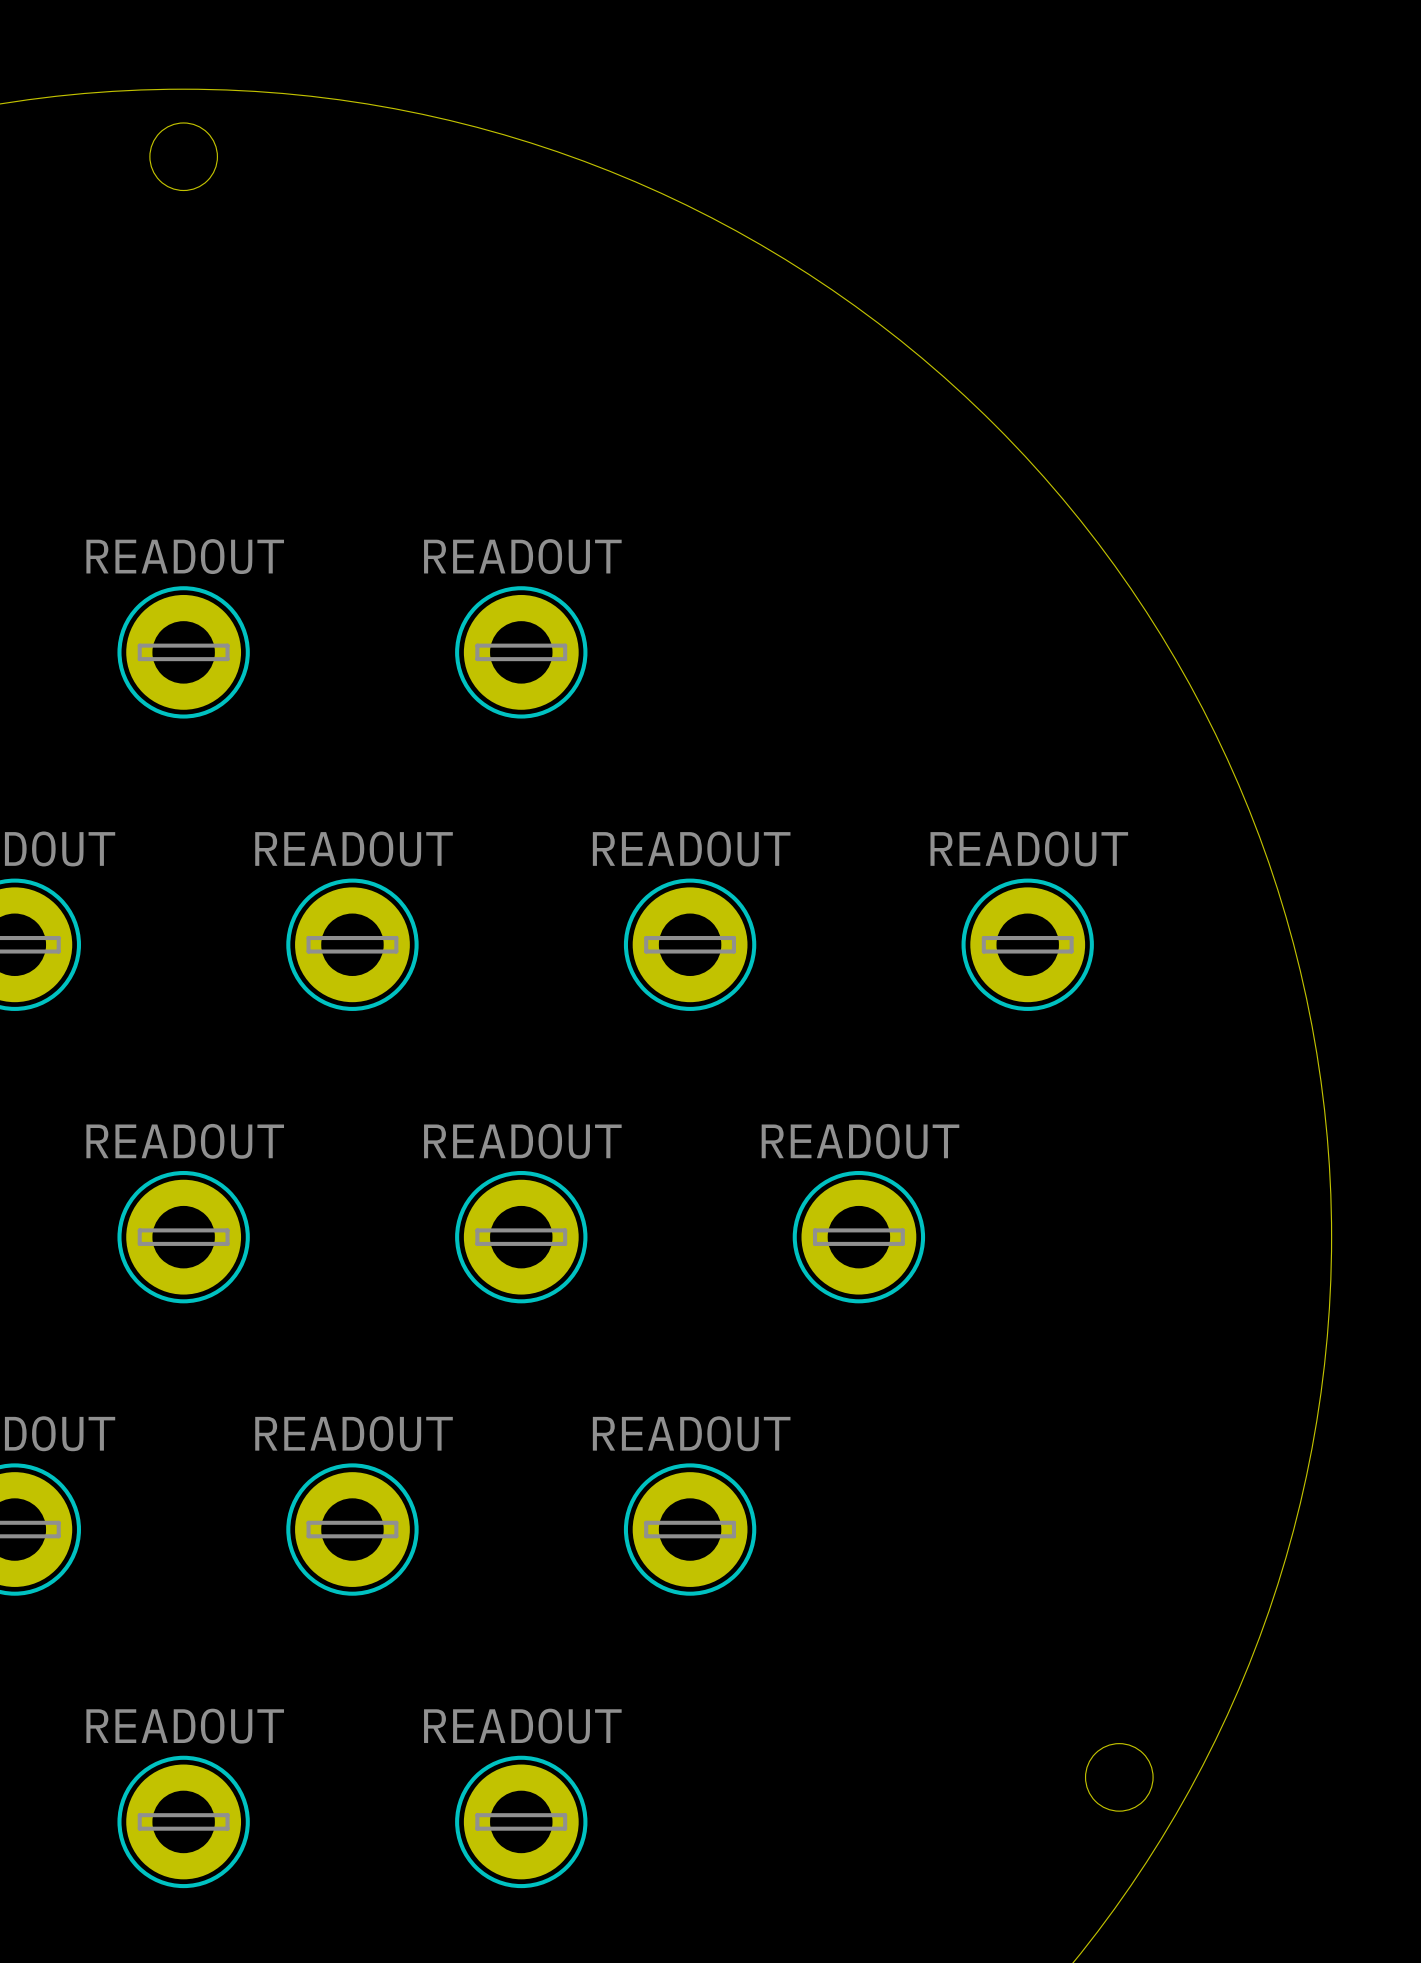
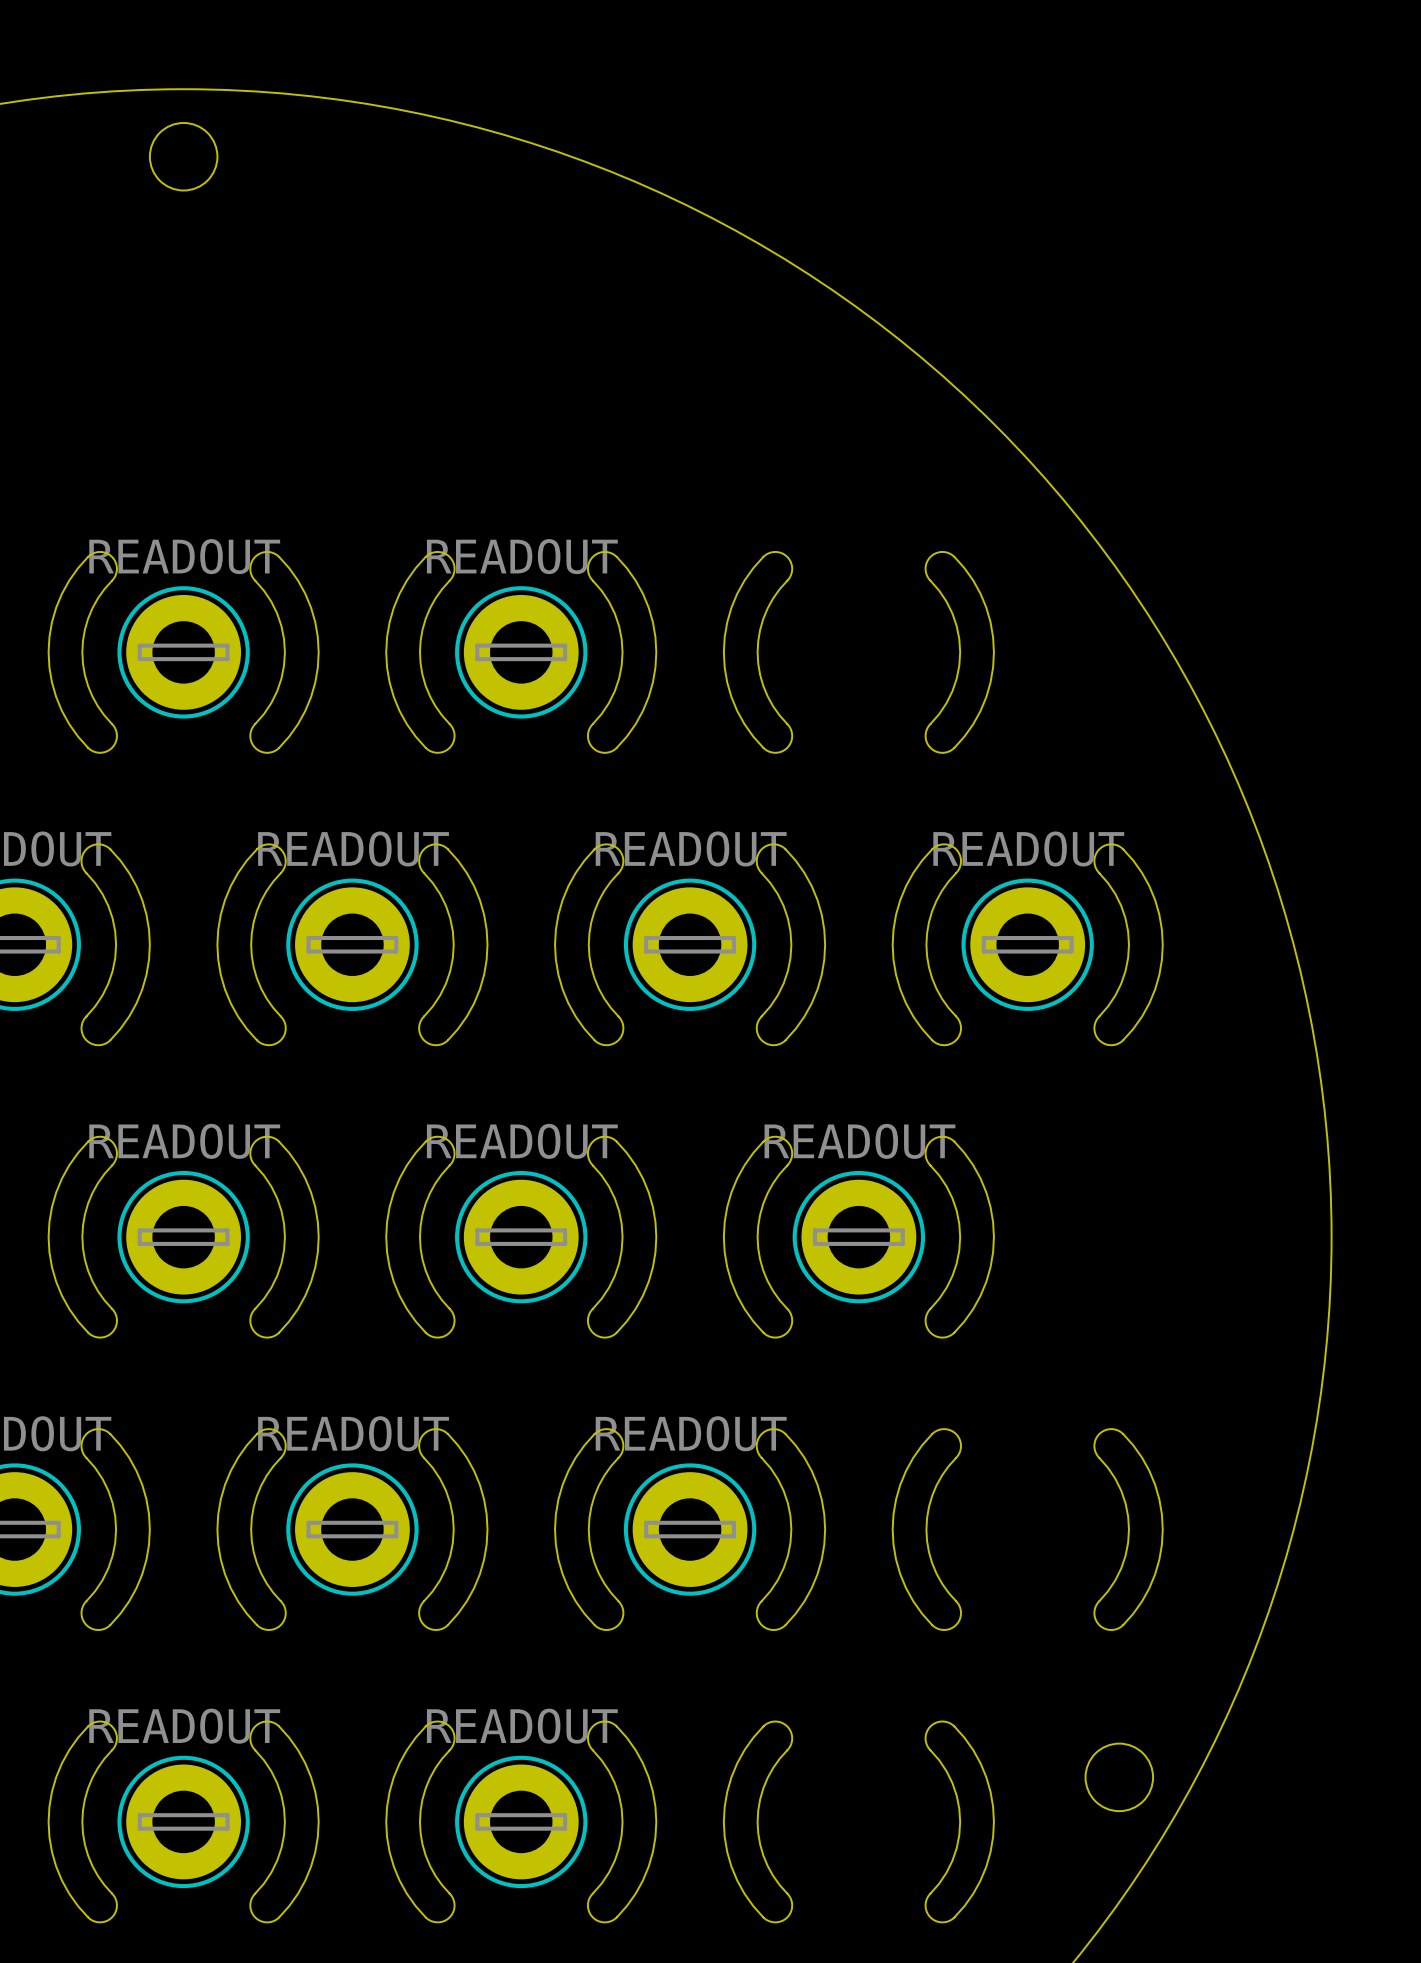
board edge: none -> (88, 556) (97, 552) (106, 553) (113, 558) (116, 566) (114, 577) (92, 608) (82, 641) (82, 663) (88, 685) (97, 706) (113, 725) (116, 733) (113, 746) (102, 752) (89, 749) (69, 724) (56, 696) (49, 667) (49, 637) (56, 607) (69, 580) (88, 556)
board edge: none -> (279, 556) (297, 580) (311, 607) (317, 637) (317, 667) (311, 696) (297, 724) (277, 749) (266, 752) (253, 746) (250, 732) (277, 691) (284, 665) (284, 639) (277, 613) (263, 590) (252, 577) (250, 567) (253, 558) (262, 552) (272, 552) (279, 556)
board edge: none -> (425, 556) (406, 580) (393, 607) (387, 637) (387, 667) (393, 696) (406, 724) (427, 749) (439, 752) (451, 746) (454, 733) (451, 725) (435, 706) (425, 685) (420, 663) (420, 641) (430, 608) (452, 577) (454, 566) (451, 558) (444, 553) (435, 552) (425, 556)
board edge: none -> (616, 556) (635, 580) (648, 607) (655, 637) (655, 667) (648, 696) (635, 724) (615, 749) (603, 752) (591, 746) (588, 732) (614, 691) (621, 665) (621, 639) (614, 613) (601, 590) (590, 577) (588, 566) (591, 558) (600, 552) (609, 552) (616, 556)
board edge: none -> (763, 556) (744, 580) (731, 607) (724, 637) (724, 667) (731, 696) (744, 724) (765, 749) (777, 752) (788, 746) (792, 733) (788, 725) (773, 706) (763, 685) (758, 663) (758, 641) (767, 608) (789, 577) (792, 566) (788, 558) (781, 553) (773, 552) (763, 556)
board edge: none -> (954, 556) (946, 552) (938, 552) (929, 558) (925, 566) (927, 577) (939, 590) (952, 613) (959, 639) (959, 665) (952, 691) (925, 732) (929, 746) (941, 752) (954, 747) (973, 724) (986, 696) (993, 667) (993, 637) (986, 607) (973, 580) (954, 556)
board edge: none -> (110, 849) (103, 845) (93, 845) (85, 850) (81, 860) (83, 869) (95, 883) (108, 906) (115, 931) (115, 957) (108, 983) (81, 1025) (85, 1038) (97, 1045) (110, 1040) (129, 1016) (142, 989) (149, 959) (149, 929) (142, 900) (129, 872) (110, 849)
board edge: none -> (256, 849) (265, 844) (273, 845) (282, 850) (285, 860) (283, 869) (261, 900) (251, 933) (251, 956) (256, 978) (266, 998) (282, 1018) (285, 1026) (282, 1038) (271, 1045) (258, 1041) (238, 1016) (224, 989) (218, 959) (218, 929) (224, 900) (238, 872) (256, 849)
board edge: none -> (447, 849) (466, 872) (479, 900) (486, 929) (486, 959) (479, 989) (466, 1016) (446, 1041) (433, 1045) (422, 1038) (419, 1026) (421, 1019) (432, 1006) (446, 983) (452, 957) (452, 931) (446, 906) (432, 883) (421, 869) (419, 859) (422, 850) (431, 844) (440, 844) (447, 849)
board edge: none -> (594, 849) (603, 844) (611, 845) (619, 850) (623, 860) (620, 869) (598, 900) (589, 933) (589, 956) (594, 978) (604, 998) (619, 1018) (623, 1026) (619, 1038) (608, 1045) (596, 1041) (575, 1016) (562, 989) (555, 959) (555, 929) (562, 900) (575, 872) (594, 849)
board edge: none -> (785, 849) (804, 872) (817, 900) (824, 929) (824, 959) (817, 989) (804, 1016) (783, 1041) (771, 1045) (760, 1038) (756, 1026) (759, 1019) (770, 1006) (783, 983) (790, 957) (790, 931) (783, 906) (770, 883) (759, 869) (756, 860) (760, 850) (768, 845) (778, 845) (785, 849)
board edge: none -> (932, 849) (913, 872) (900, 900) (893, 929) (893, 959) (900, 989) (913, 1016) (933, 1041) (946, 1045) (957, 1038) (960, 1026) (957, 1018) (941, 998) (932, 978) (927, 956) (927, 933) (936, 900) (958, 869) (961, 860) (957, 850) (949, 845) (941, 844) (932, 849)
board edge: none -> (1123, 849) (1116, 845) (1106, 845) (1097, 850) (1094, 860) (1096, 869) (1108, 883) (1121, 906) (1128, 931) (1128, 957) (1121, 983) (1108, 1006) (1096, 1019) (1094, 1026) (1097, 1038) (1109, 1045) (1121, 1041) (1142, 1016) (1155, 989) (1161, 959) (1161, 929) (1155, 900) (1142, 872) (1123, 849)
board edge: none -> (88, 1141) (69, 1165) (56, 1192) (49, 1222) (49, 1252) (56, 1281) (69, 1309) (88, 1332) (101, 1337) (113, 1331) (116, 1317) (113, 1310) (97, 1291) (88, 1270) (82, 1248) (82, 1225) (92, 1193) (114, 1162) (116, 1152) (113, 1143) (105, 1137) (95, 1137) (88, 1141)
board edge: none -> (279, 1141) (298, 1165) (311, 1192) (317, 1222) (317, 1252) (311, 1281) (298, 1309) (279, 1332) (266, 1337) (253, 1331) (250, 1317) (277, 1275) (284, 1250) (284, 1223) (277, 1198) (264, 1175) (252, 1162) (250, 1151) (253, 1143) (260, 1137) (269, 1136) (279, 1141)
board edge: none -> (425, 1141) (435, 1136) (444, 1138) (451, 1143) (454, 1151) (452, 1162) (430, 1193) (420, 1225) (420, 1248) (425, 1270) (435, 1291) (451, 1310) (454, 1318) (451, 1330) (439, 1337) (427, 1334) (406, 1309) (393, 1281) (387, 1252) (387, 1222) (393, 1192) (406, 1165) (425, 1141)
board edge: none -> (616, 1141) (635, 1165) (648, 1192) (655, 1222) (655, 1252) (648, 1281) (635, 1309) (615, 1334) (602, 1337) (591, 1331) (588, 1318) (590, 1312) (601, 1298) (614, 1275) (621, 1250) (621, 1223) (614, 1198) (601, 1175) (590, 1162) (588, 1151) (591, 1143) (600, 1137) (609, 1137) (616, 1141)
board edge: none -> (763, 1141) (773, 1136) (781, 1138) (788, 1143) (792, 1151) (789, 1162) (767, 1193) (758, 1225) (758, 1248) (763, 1270) (773, 1291) (788, 1310) (792, 1318) (788, 1330) (777, 1337) (765, 1334) (744, 1309) (731, 1281) (724, 1252) (724, 1222) (731, 1192) (744, 1165) (763, 1141)
board edge: none -> (954, 1141) (973, 1165) (986, 1192) (993, 1222) (993, 1252) (986, 1281) (973, 1309) (952, 1334) (940, 1337) (929, 1331) (925, 1318) (927, 1312) (939, 1298) (952, 1275) (959, 1250) (959, 1223) (952, 1198) (939, 1175) (928, 1162) (925, 1152) (929, 1143) (937, 1137) (947, 1137) (954, 1141)
board edge: none -> (110, 1434) (129, 1457) (142, 1484) (149, 1514) (149, 1544) (142, 1574) (129, 1601) (108, 1626) (96, 1629) (84, 1623) (81, 1610) (83, 1604) (95, 1591) (108, 1568) (115, 1542) (115, 1516) (108, 1490) (95, 1467) (83, 1454) (81, 1444) (85, 1435) (93, 1429) (103, 1429) (110, 1434)
board edge: none -> (256, 1434) (266, 1429) (275, 1430) (282, 1435) (285, 1443) (283, 1454) (261, 1485) (251, 1518) (251, 1540) (256, 1562) (266, 1583) (282, 1602) (285, 1610) (282, 1623) (271, 1629) (258, 1626) (238, 1601) (224, 1574) (218, 1544) (218, 1514) (224, 1484) (238, 1457) (256, 1434)
board edge: none -> (447, 1434) (466, 1457) (479, 1484) (486, 1514) (486, 1544) (479, 1574) (466, 1601) (446, 1626) (434, 1629) (422, 1623) (419, 1610) (446, 1568) (452, 1542) (452, 1516) (446, 1490) (432, 1467) (421, 1454) (419, 1444) (422, 1435) (430, 1429) (441, 1429) (447, 1434)
board edge: none -> (594, 1434) (604, 1429) (612, 1430) (619, 1435) (623, 1443) (621, 1454) (598, 1485) (589, 1518) (589, 1540) (594, 1562) (604, 1583) (619, 1602) (623, 1610) (619, 1623) (608, 1629) (596, 1626) (575, 1601) (562, 1574) (555, 1544) (555, 1514) (562, 1484) (575, 1457) (594, 1434)
board edge: none -> (785, 1434) (804, 1457) (817, 1484) (824, 1514) (824, 1544) (817, 1574) (804, 1601) (784, 1626) (772, 1629) (760, 1623) (757, 1610) (783, 1568) (790, 1542) (790, 1516) (783, 1490) (770, 1467) (759, 1454) (756, 1444) (760, 1435) (768, 1429) (778, 1429) (785, 1434)
board edge: none -> (932, 1434) (941, 1429) (949, 1429) (957, 1435) (961, 1444) (958, 1454) (936, 1485) (927, 1518) (927, 1540) (932, 1562) (941, 1583) (957, 1602) (960, 1610) (957, 1623) (946, 1629) (933, 1626) (913, 1601) (900, 1574) (893, 1544) (893, 1514) (900, 1484) (913, 1457) (932, 1434)
board edge: none -> (1123, 1434) (1142, 1457) (1155, 1484) (1161, 1514) (1161, 1544) (1155, 1574) (1142, 1601) (1121, 1626) (1110, 1629) (1097, 1623) (1094, 1610) (1121, 1568) (1128, 1542) (1128, 1516) (1121, 1490) (1108, 1467) (1096, 1454) (1094, 1444) (1097, 1435) (1106, 1429) (1116, 1429) (1123, 1434)
board edge: none -> (88, 1726) (69, 1750) (56, 1777) (49, 1806) (49, 1837) (56, 1866) (69, 1893) (89, 1918) (102, 1922) (113, 1915) (116, 1903) (113, 1895) (97, 1875) (88, 1855) (82, 1833) (82, 1810) (92, 1777) (114, 1747) (116, 1737) (113, 1727) (105, 1722) (97, 1721) (88, 1726)
board edge: none -> (279, 1726) (297, 1750) (311, 1777) (317, 1806) (317, 1837) (311, 1866) (297, 1893) (277, 1918) (266, 1922) (253, 1915) (250, 1902) (277, 1860) (284, 1835) (284, 1808) (277, 1783) (263, 1760) (252, 1746) (250, 1736) (253, 1728) (262, 1722) (271, 1722) (279, 1726)
board edge: none -> (425, 1726) (406, 1750) (393, 1777) (387, 1806) (387, 1837) (393, 1866) (406, 1893) (427, 1918) (439, 1922) (451, 1915) (454, 1903) (451, 1895) (435, 1875) (425, 1855) (420, 1833) (420, 1810) (430, 1777) (452, 1746) (454, 1736) (451, 1728) (444, 1722) (435, 1721) (425, 1726)
board edge: none -> (616, 1726) (635, 1750) (648, 1777) (655, 1806) (655, 1837) (648, 1866) (635, 1893) (615, 1918) (603, 1922) (591, 1915) (588, 1902) (614, 1860) (621, 1835) (621, 1808) (614, 1783) (601, 1760) (590, 1747) (587, 1737) (591, 1727) (599, 1722) (609, 1722) (616, 1726)
board edge: none -> (763, 1726) (744, 1750) (731, 1777) (724, 1806) (724, 1837) (731, 1866) (744, 1893) (765, 1918) (777, 1922) (788, 1915) (792, 1903) (788, 1895) (773, 1875) (763, 1855) (758, 1833) (758, 1810) (767, 1777) (789, 1747) (792, 1737) (788, 1727) (780, 1722) (772, 1721) (763, 1726)
board edge: none -> (954, 1726) (973, 1750) (986, 1777) (993, 1806) (993, 1837) (986, 1866) (973, 1893) (952, 1918) (941, 1922) (929, 1915) (925, 1902) (952, 1860) (959, 1835) (959, 1808) (952, 1783) (939, 1760) (928, 1747) (925, 1737) (929, 1727) (937, 1722) (947, 1722) (954, 1726)

